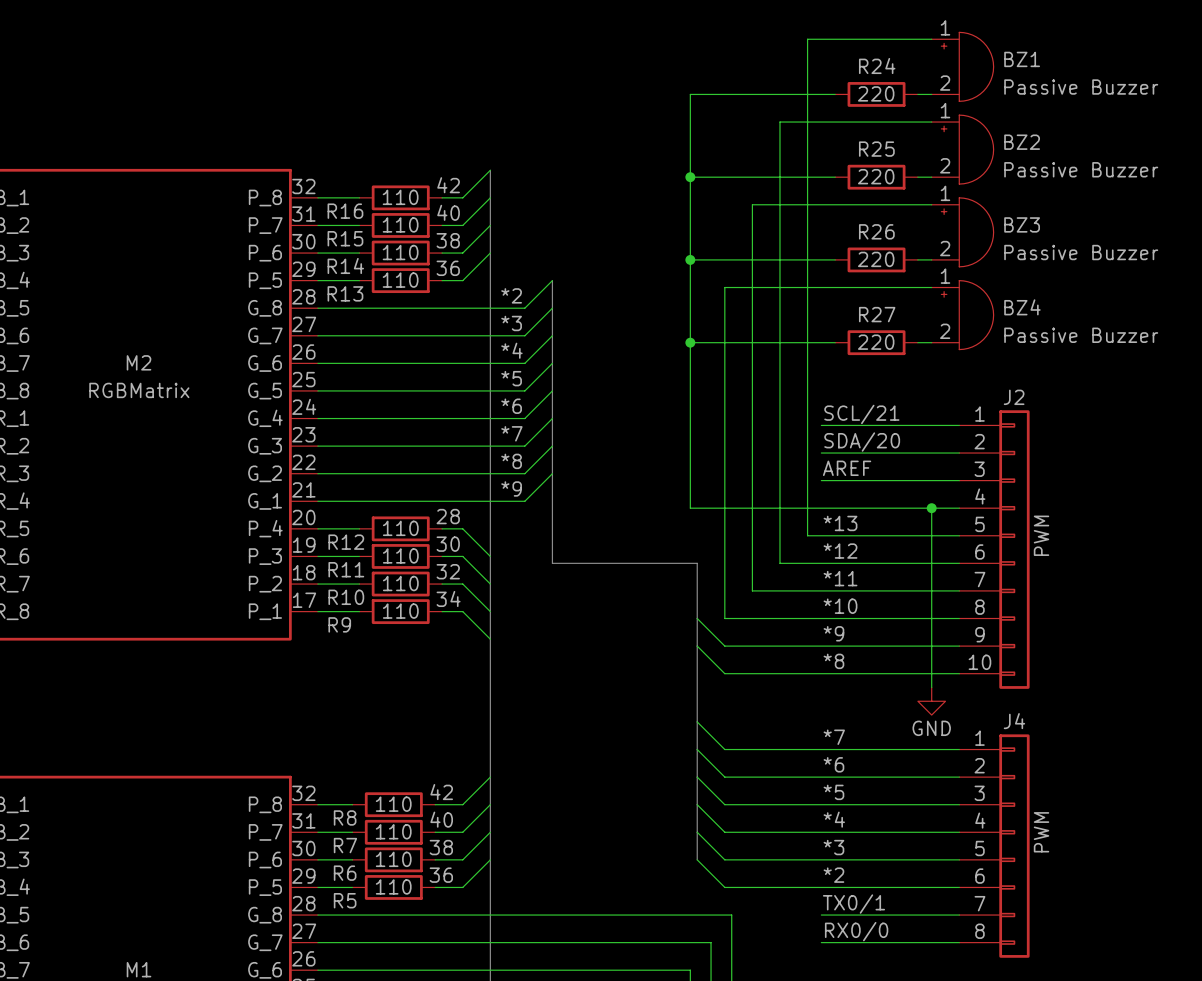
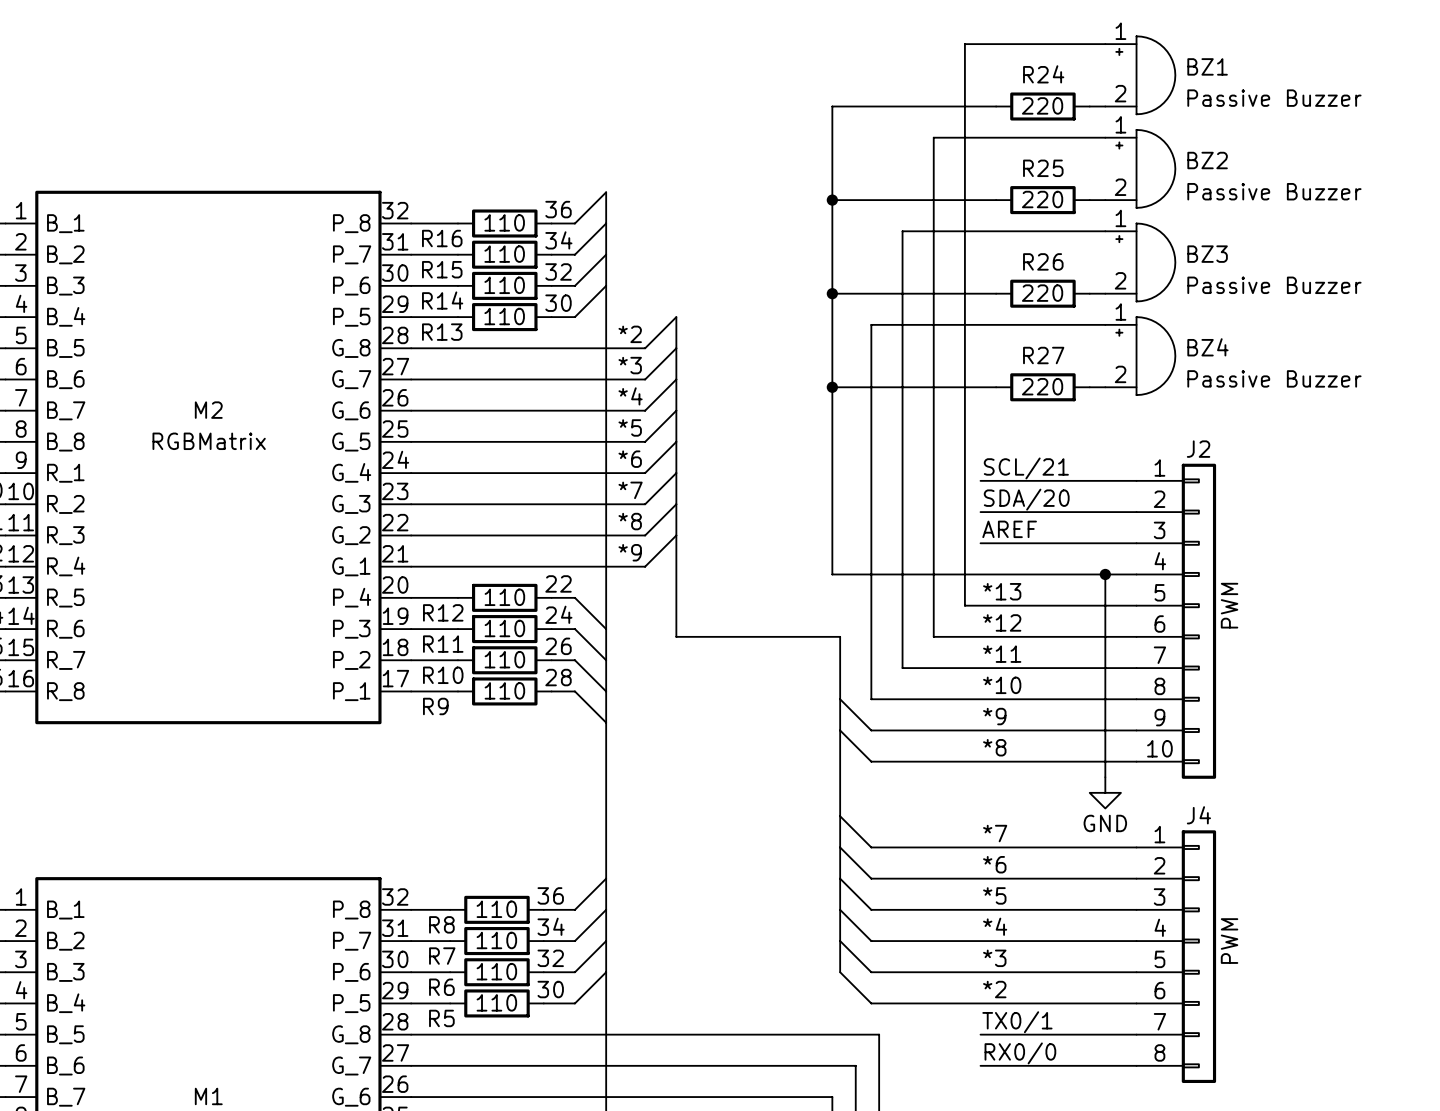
label: 42 (448, 185) -> 36 (558, 209)
label: 40 (448, 212) -> 34 (558, 240)
label: 38 (448, 240) -> 32 (558, 271)
label: 36 (448, 268) -> 30 (558, 303)
label: 28 (448, 516) -> 22 (558, 583)
label: 30 (448, 544) -> 24 (558, 614)
label: 32 (448, 571) -> 26 (558, 646)
label: 34 (448, 598) -> 28 (558, 677)
label: 42 (441, 792) -> 36 (550, 895)
label: 40 (441, 819) -> 34 (551, 926)
label: 38 (441, 847) -> 32 (550, 958)
label: 36 (441, 875) -> 30 (550, 989)

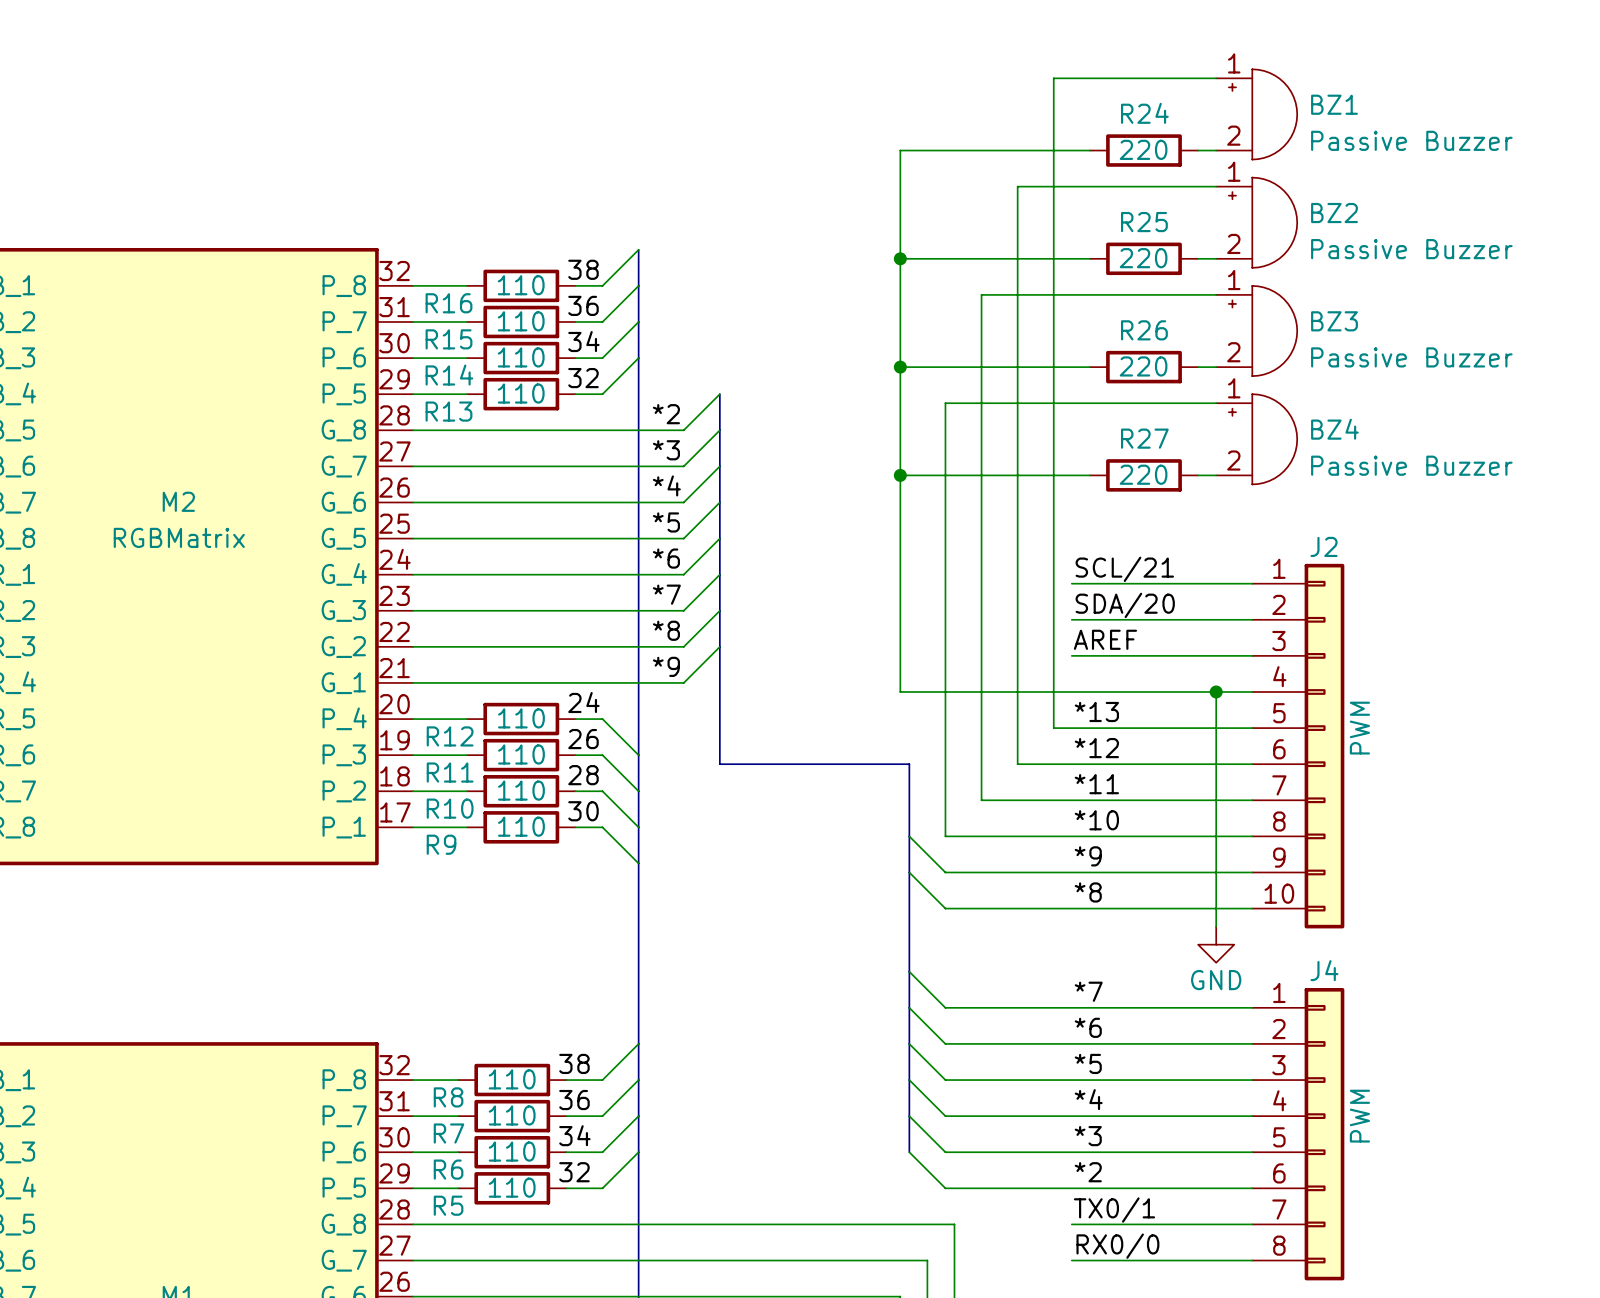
label: 36 (558, 209) -> 38 (583, 269)
label: 34 (558, 240) -> 36 (583, 305)
label: 32 (558, 271) -> 34 (583, 341)
label: 30 (558, 303) -> 32 (583, 378)
label: 22 (558, 583) -> 24 (583, 702)
label: 24 (558, 614) -> 26 (583, 739)
label: 26 (558, 646) -> 28 (583, 775)
label: 28 (558, 677) -> 30 (583, 811)
label: 36 (550, 895) -> 38 (574, 1063)
label: 34 (551, 926) -> 36 (574, 1100)
label: 32 (550, 958) -> 34 (574, 1135)
label: 30 (550, 989) -> 32 (574, 1172)

